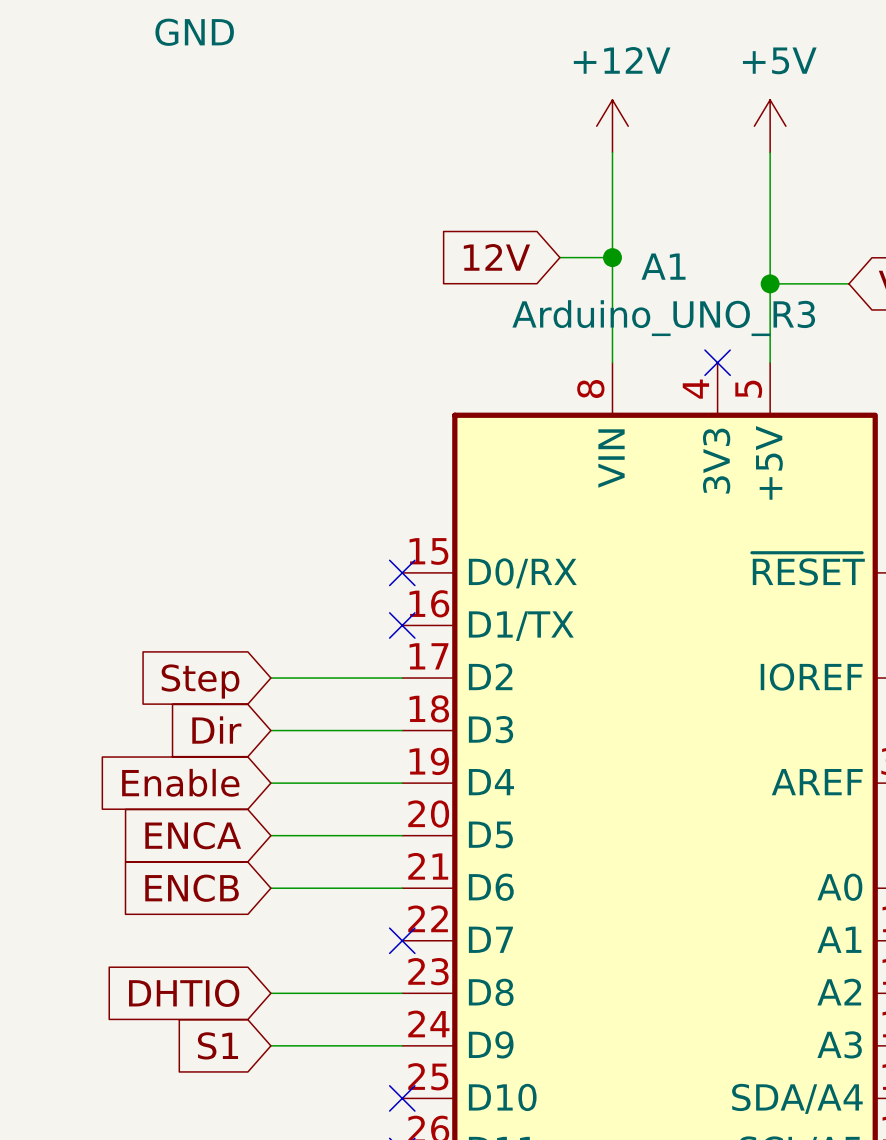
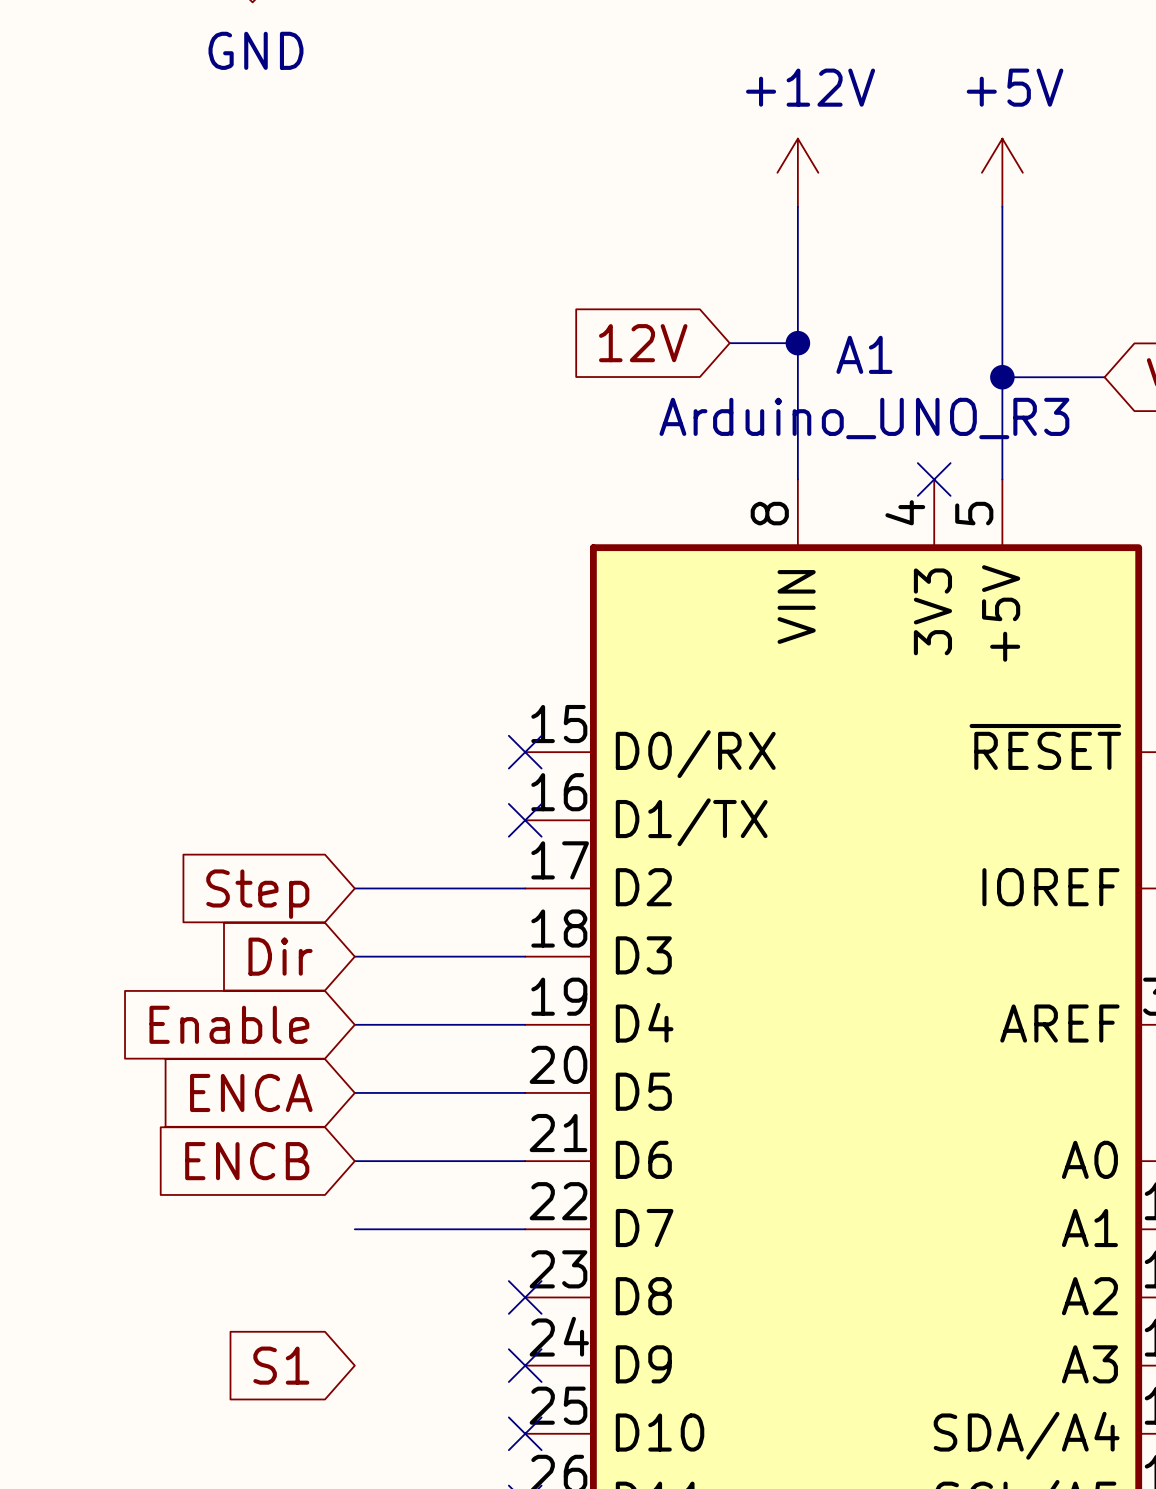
no-connect mark: (402, 940) -> none
global label: DHTIO (184, 993) -> none
wire: (270, 993) (402, 993) -> (354, 1229) (525, 1229)
no-connect mark: none -> (525, 1297)
wire: (270, 1045) (402, 1045) -> none
no-connect mark: none -> (525, 1365)

